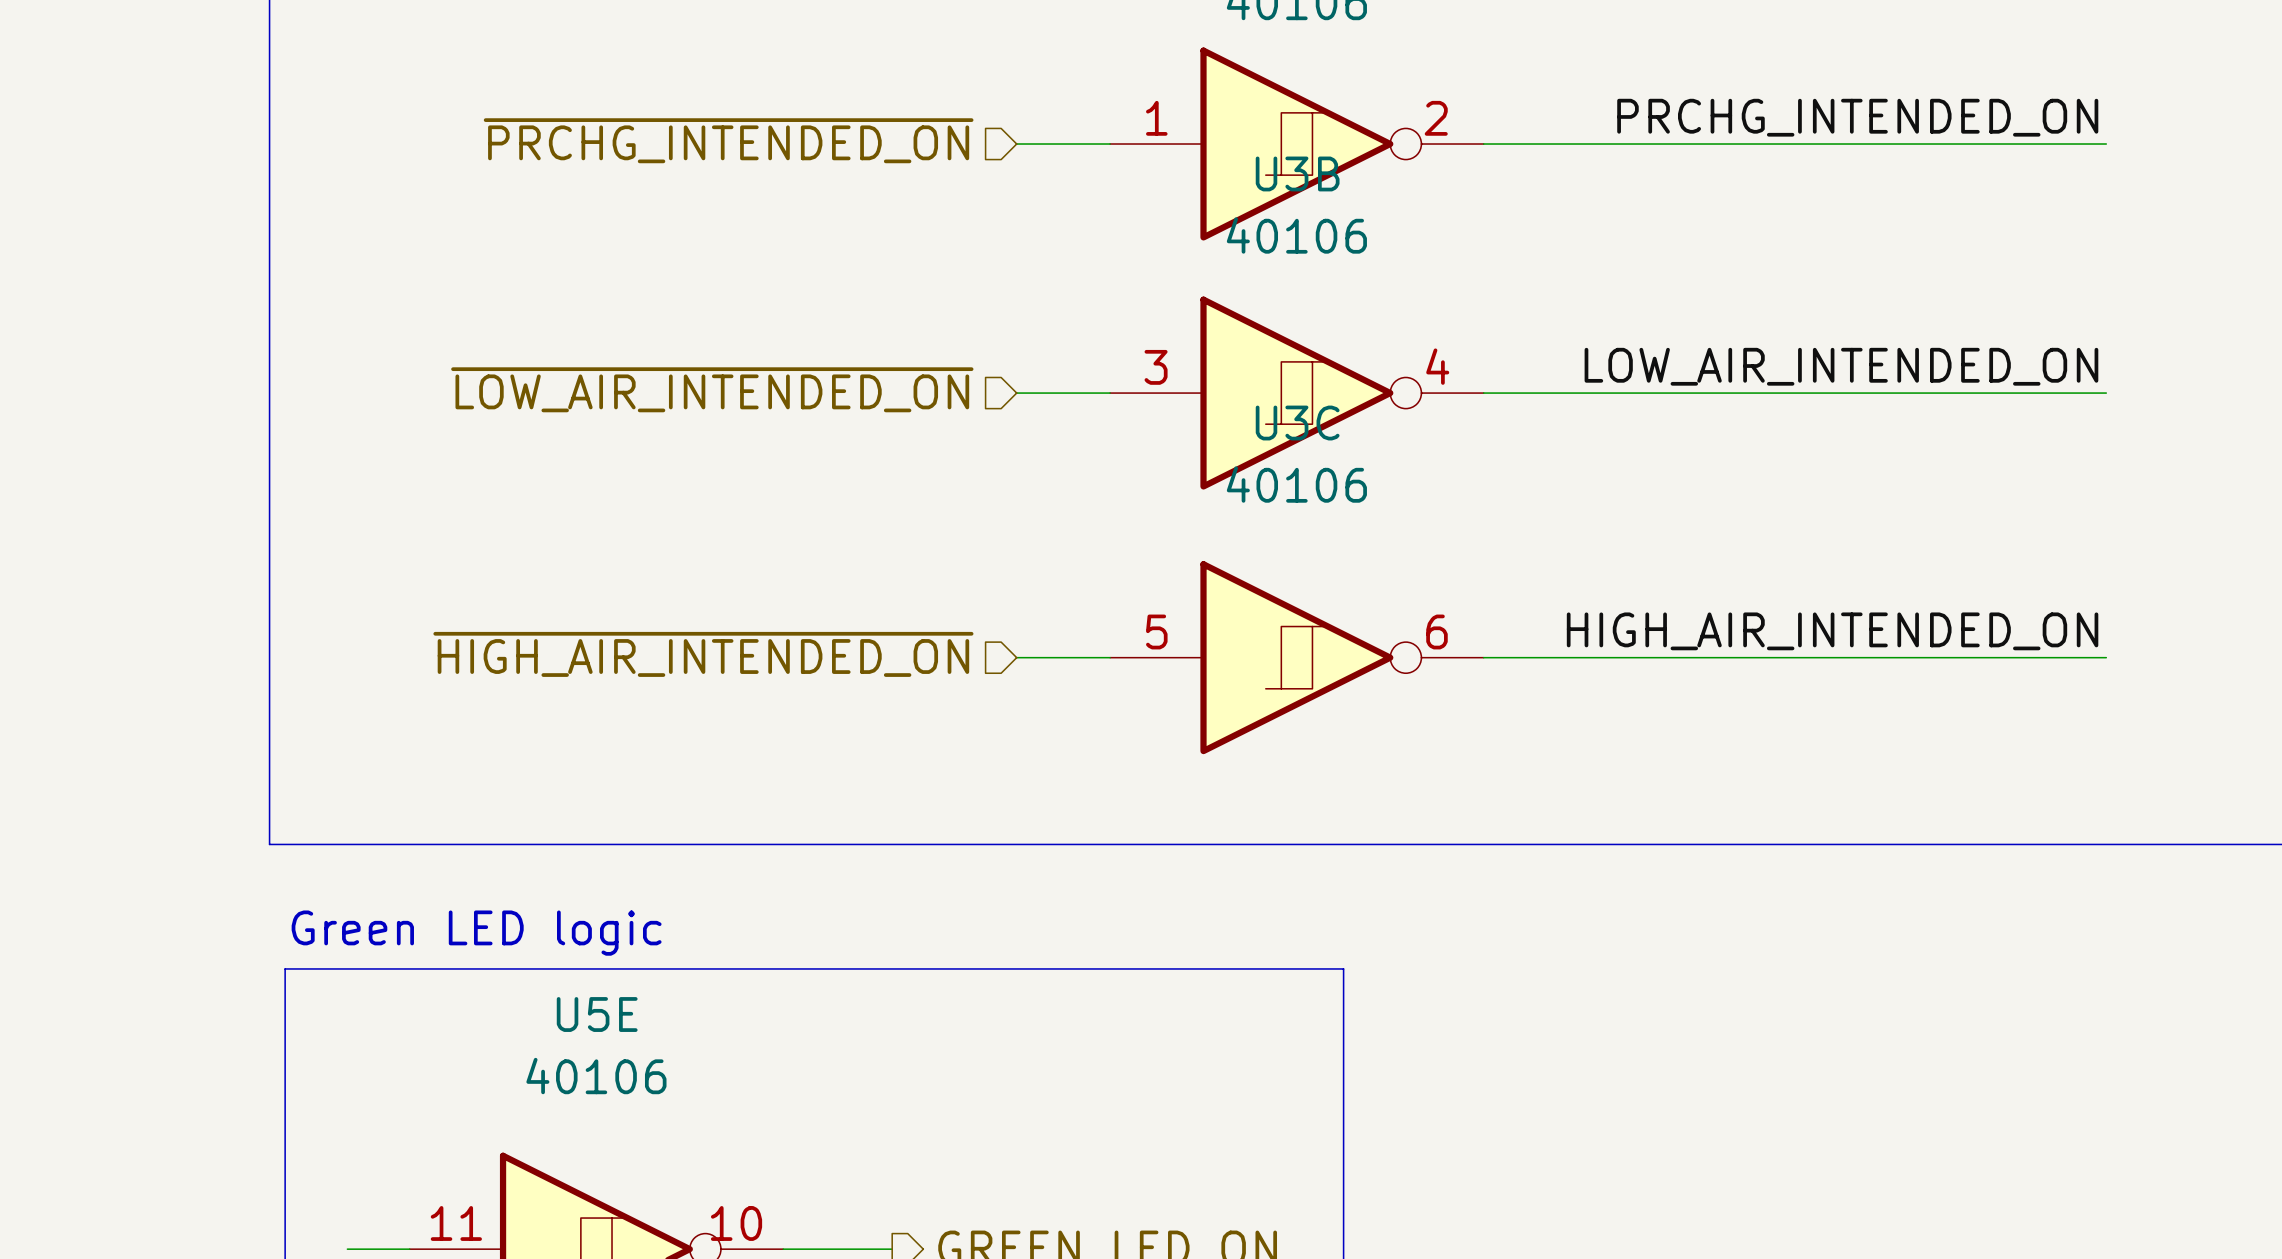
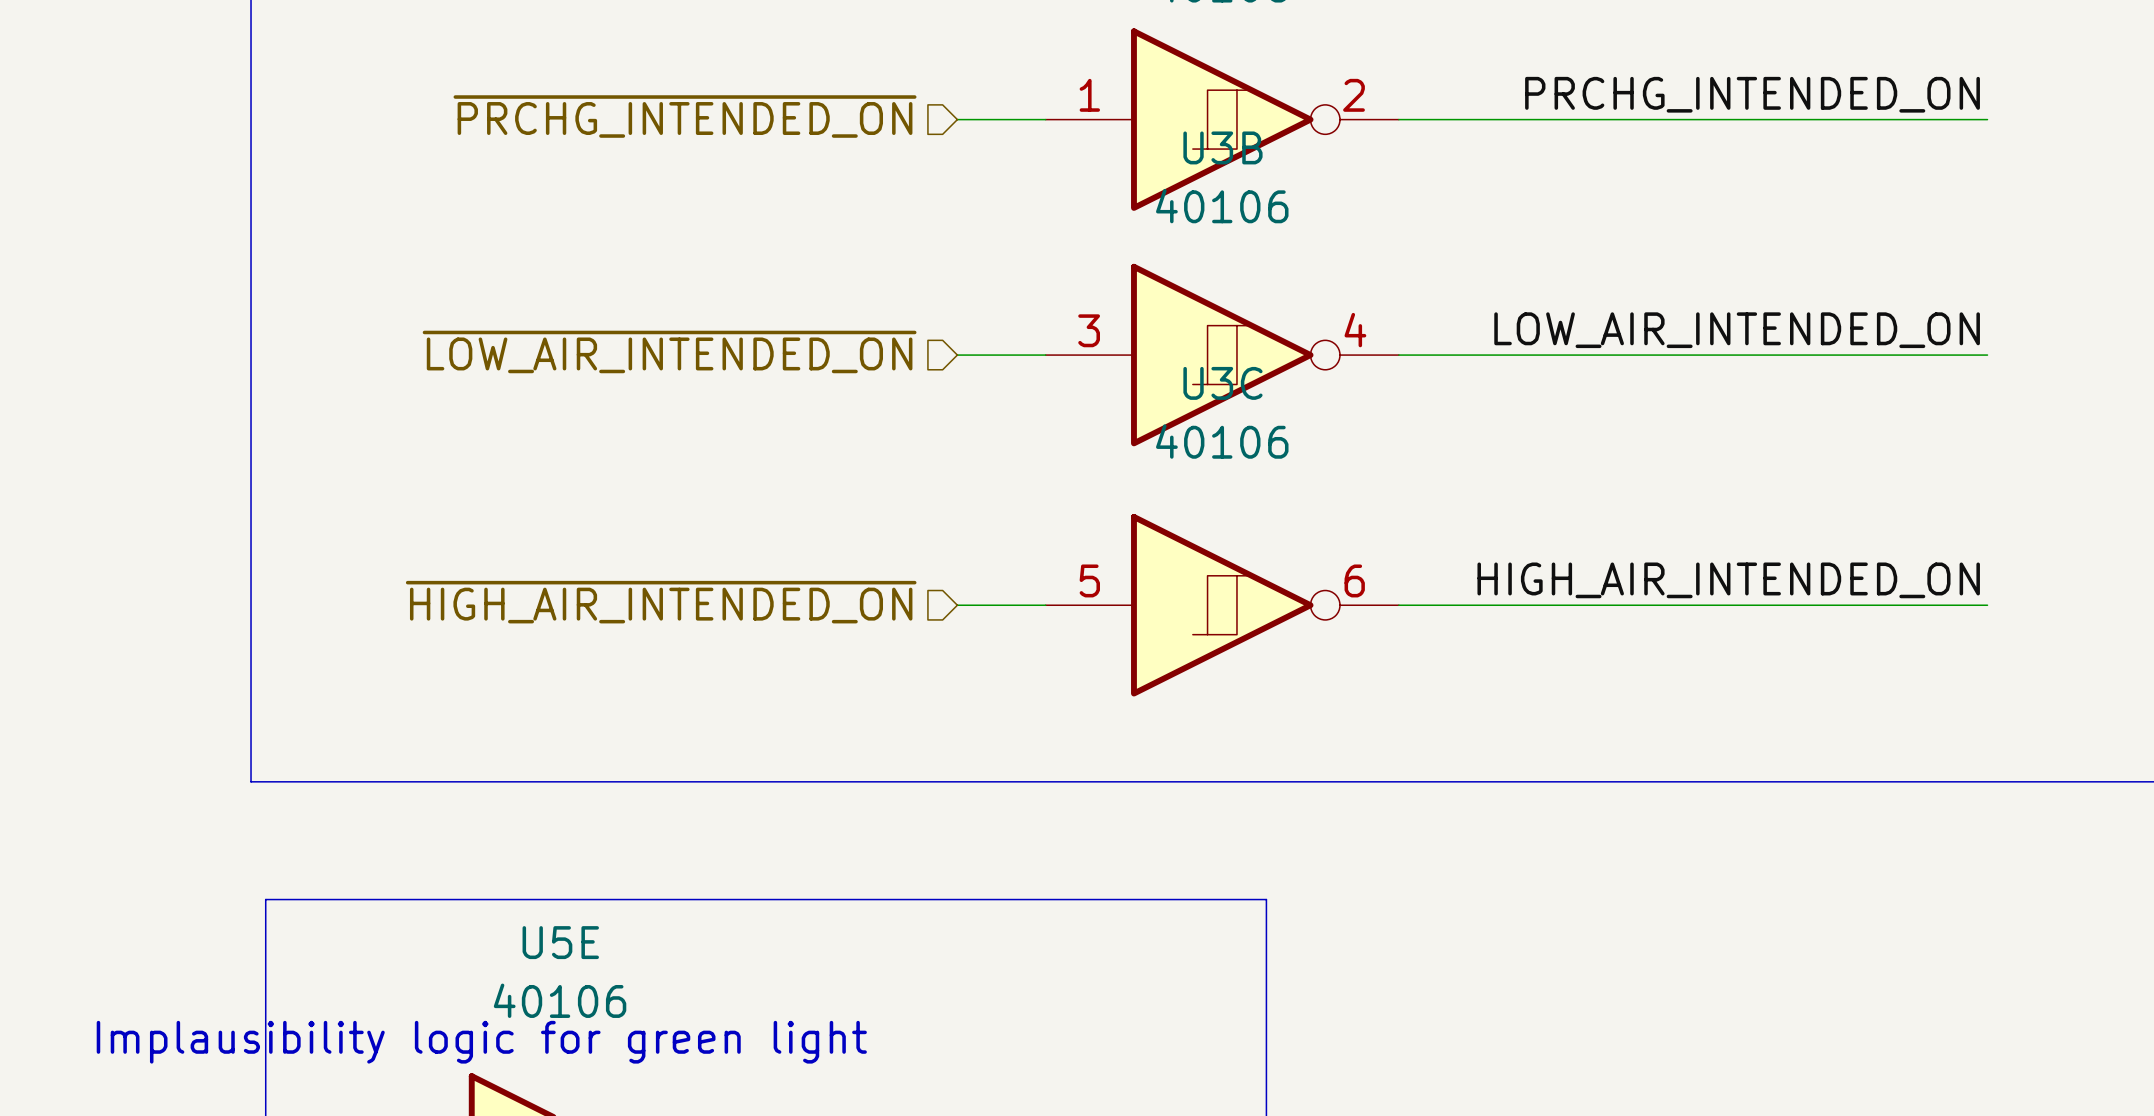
text: Green LED logic (476, 933) -> none
text: none -> Implausibility logic for green light (481, 1042)

